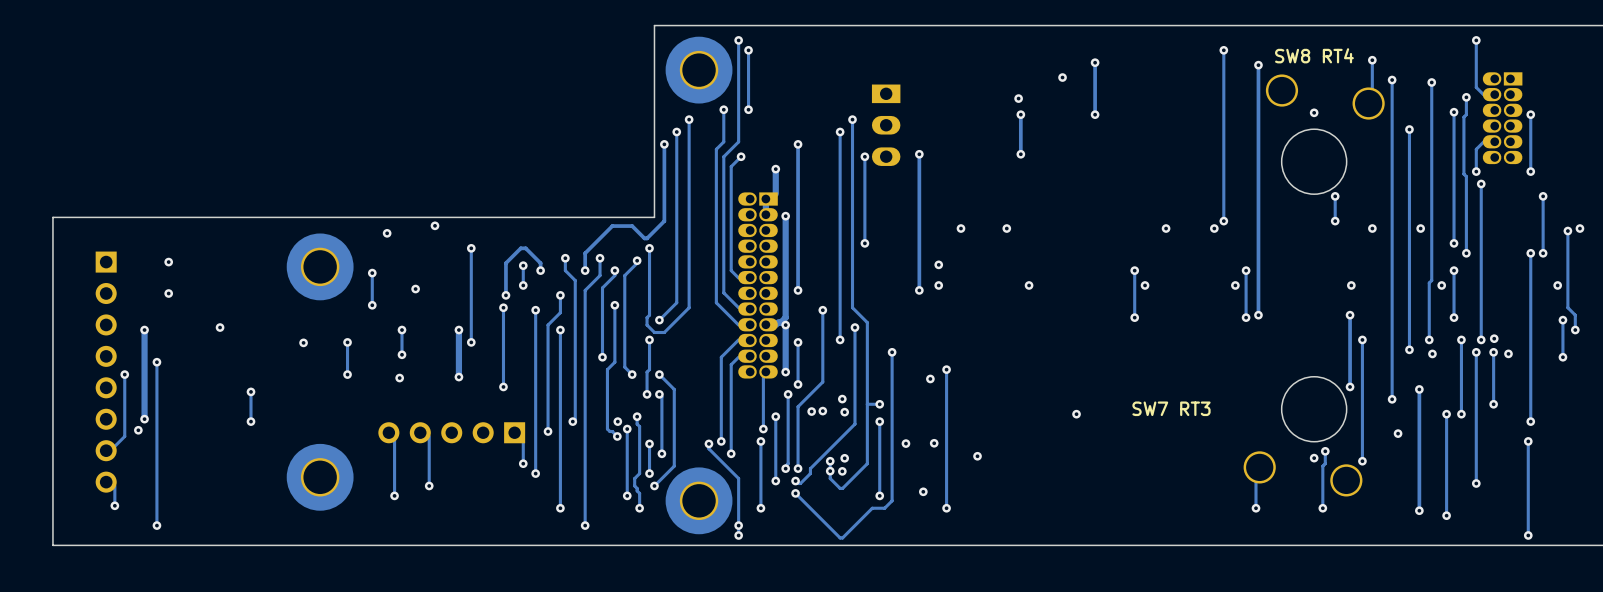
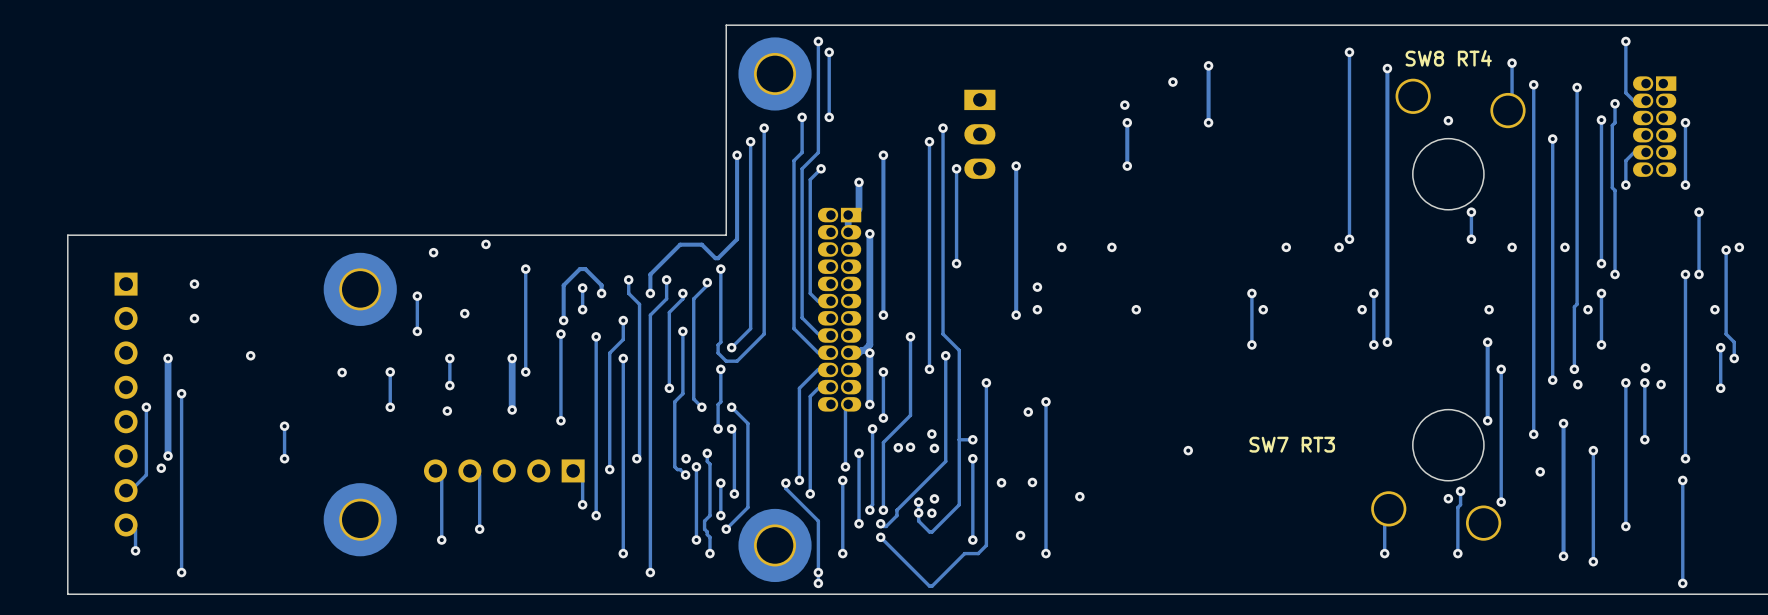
track: (1481, 183) (1481, 339) -> none
via: (1481, 183) -> none
track: (1461, 339) (1461, 414) -> none
via: (1461, 339) -> none
via: (1481, 339) -> none
via: (1461, 414) -> none

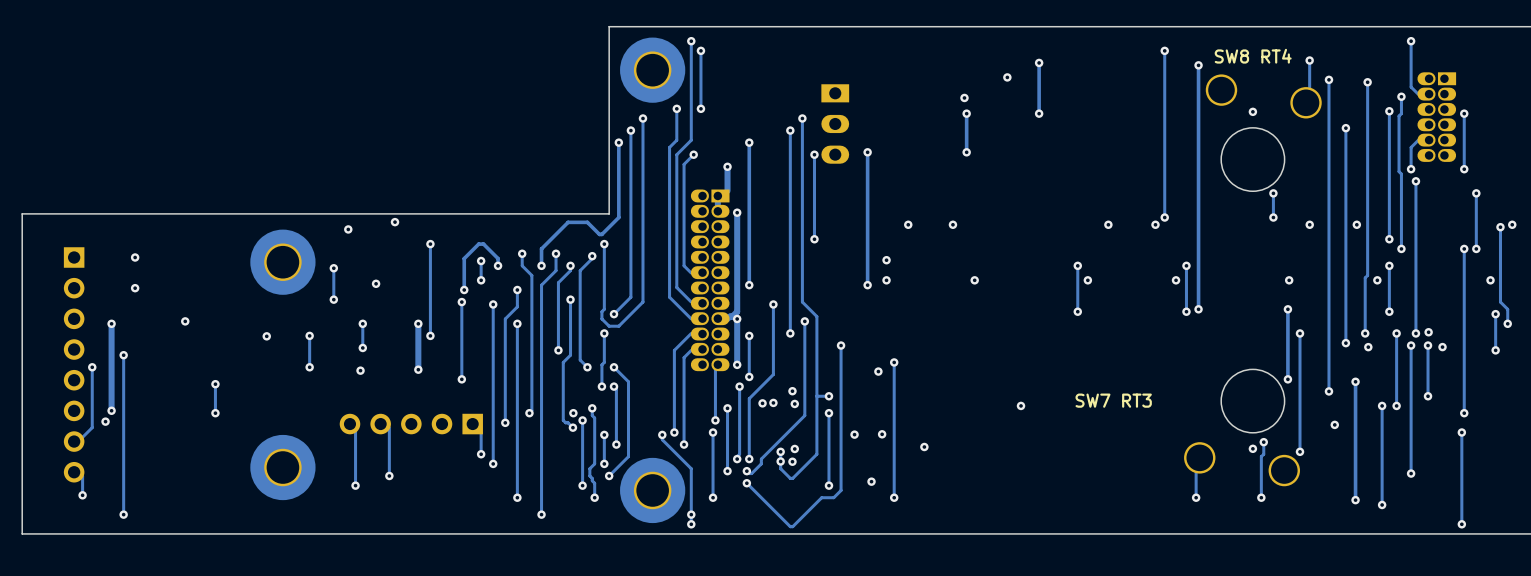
track: none -> (1415, 181) (1415, 333)
via: none -> (1415, 181)
track: none -> (1396, 333) (1396, 405)
via: none -> (1396, 333)
via: none -> (1415, 333)
via: none -> (1396, 405)

